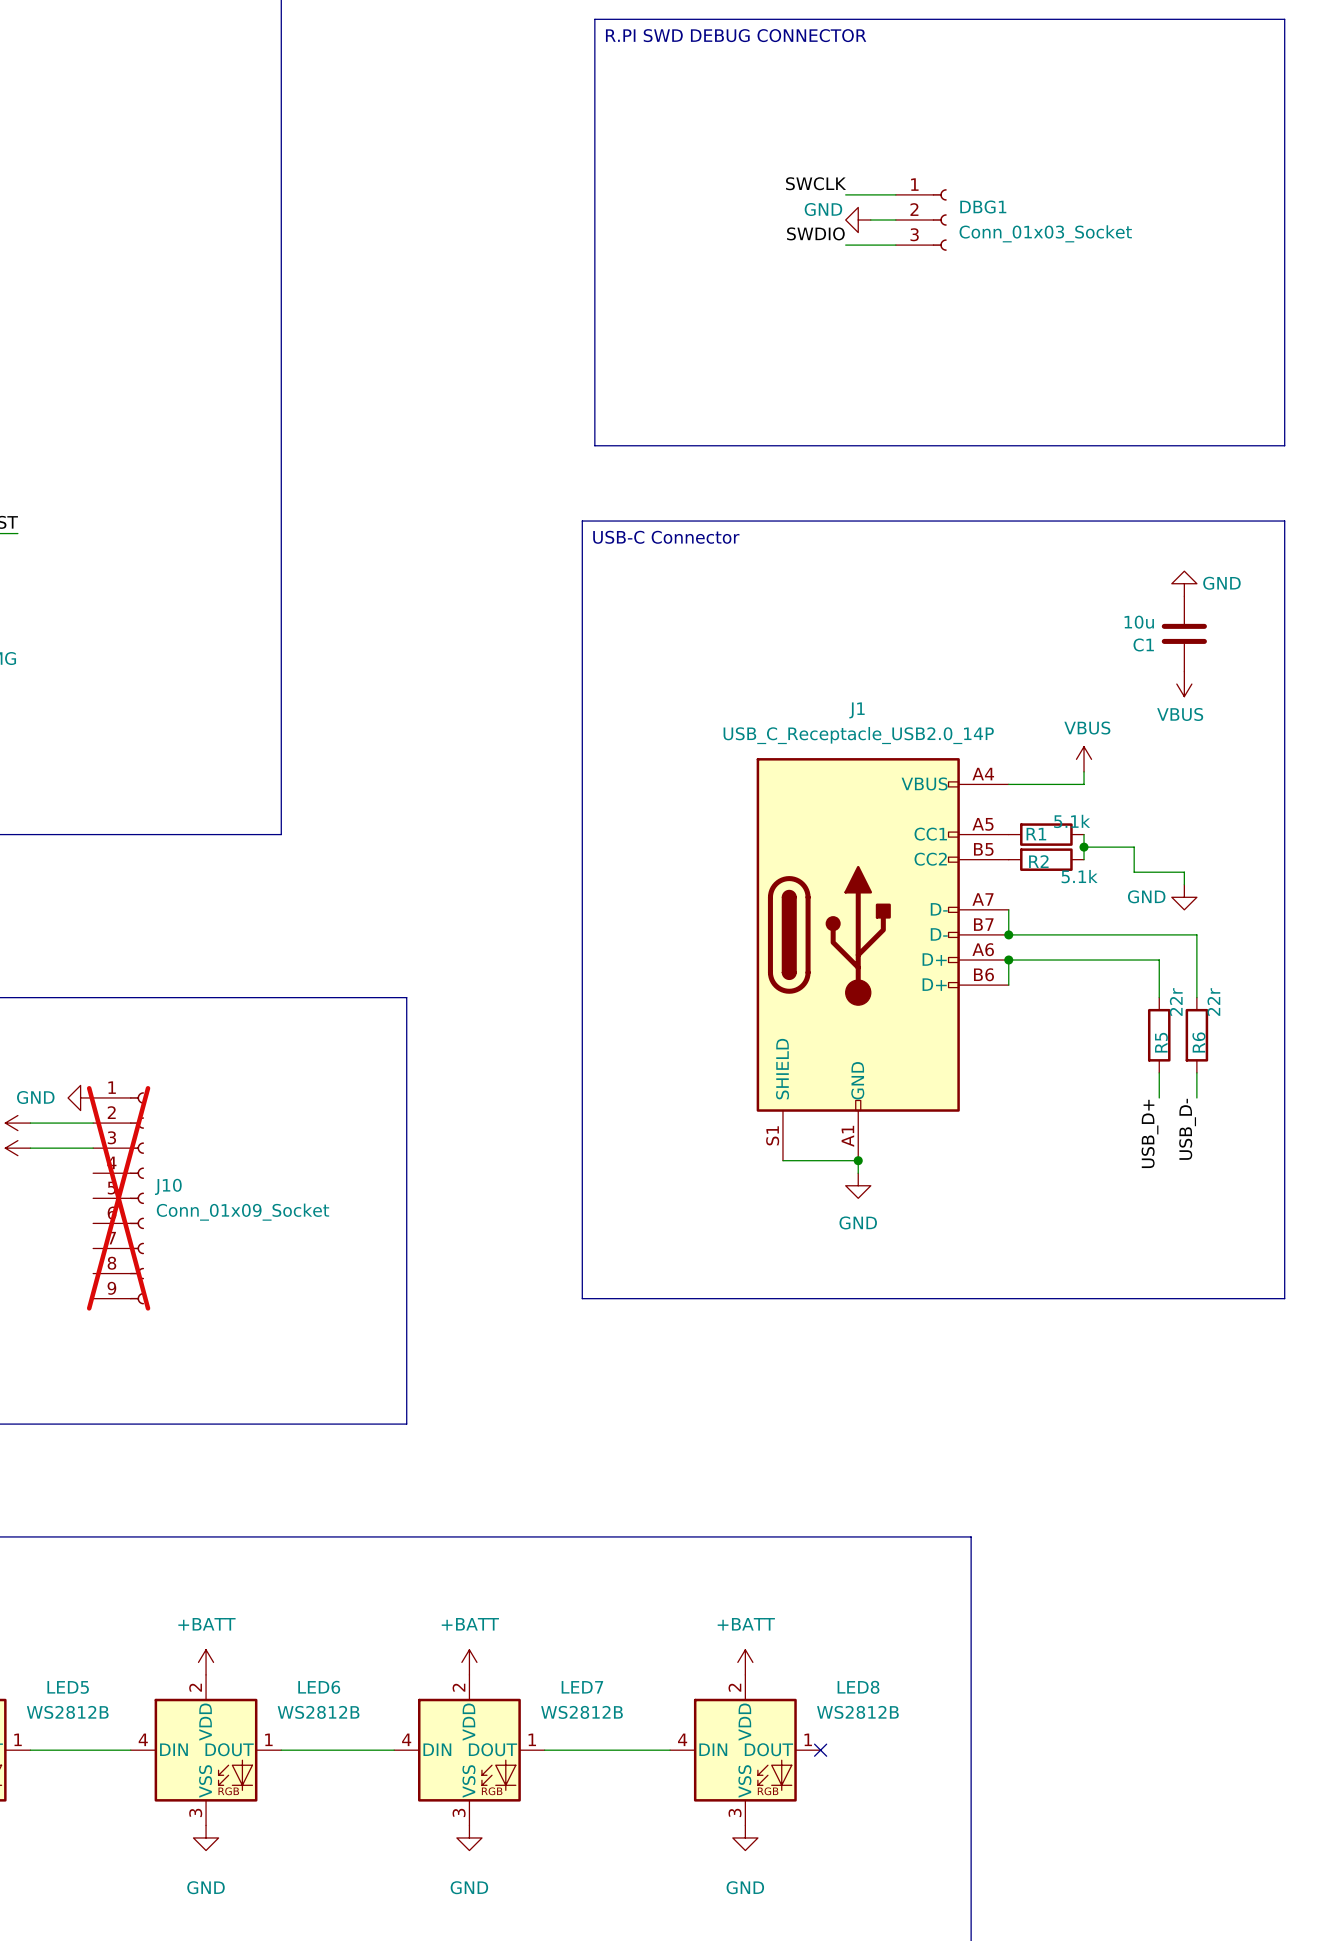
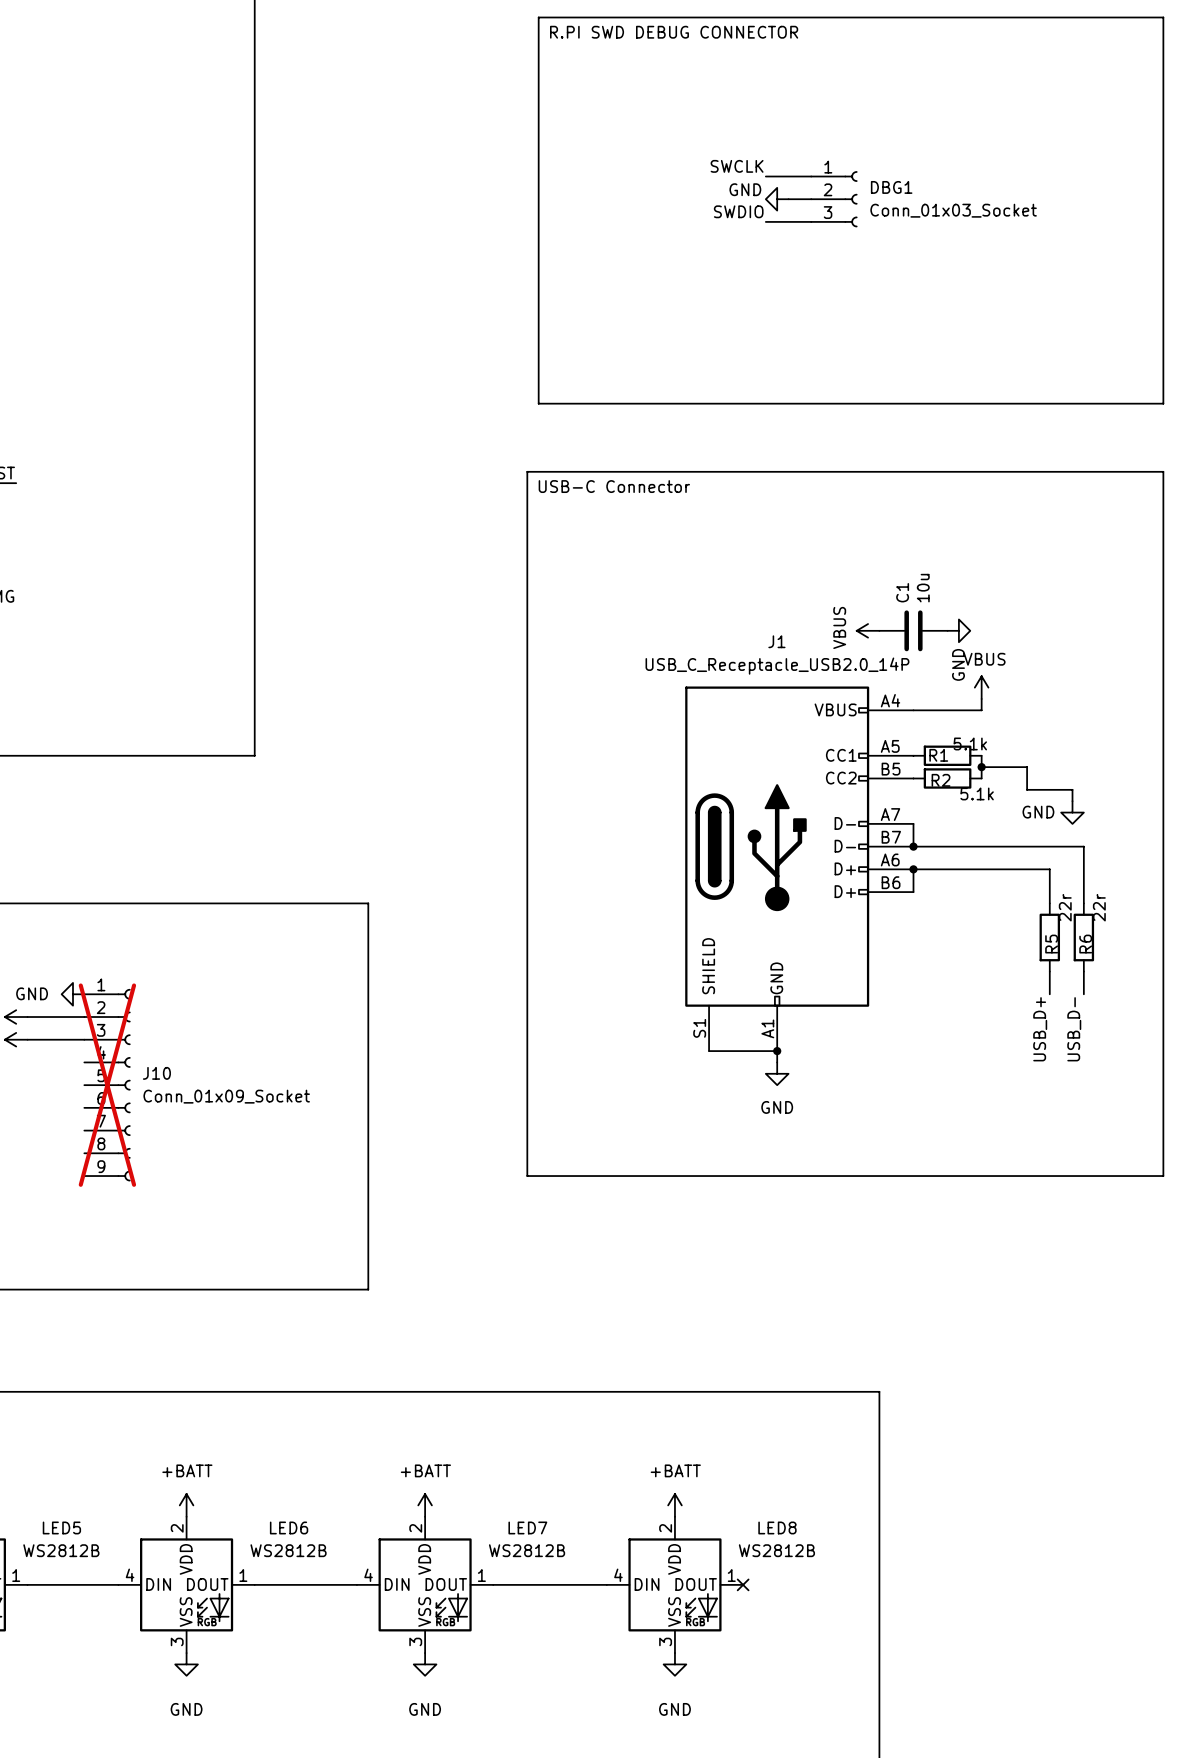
power symbol rotation: 0° (1184, 583) -> 90° clockwise (958, 630)
power symbol position: GND (1184, 583) -> GND (958, 630)
C1 rotation: 0° (1184, 633) -> 90° clockwise (913, 630)
C1 position: (1184, 633) -> (913, 630)
power symbol rotation: 0° (1184, 684) -> 90° clockwise (868, 630)
power symbol position: VBUS (1184, 684) -> VBUS (868, 630)

